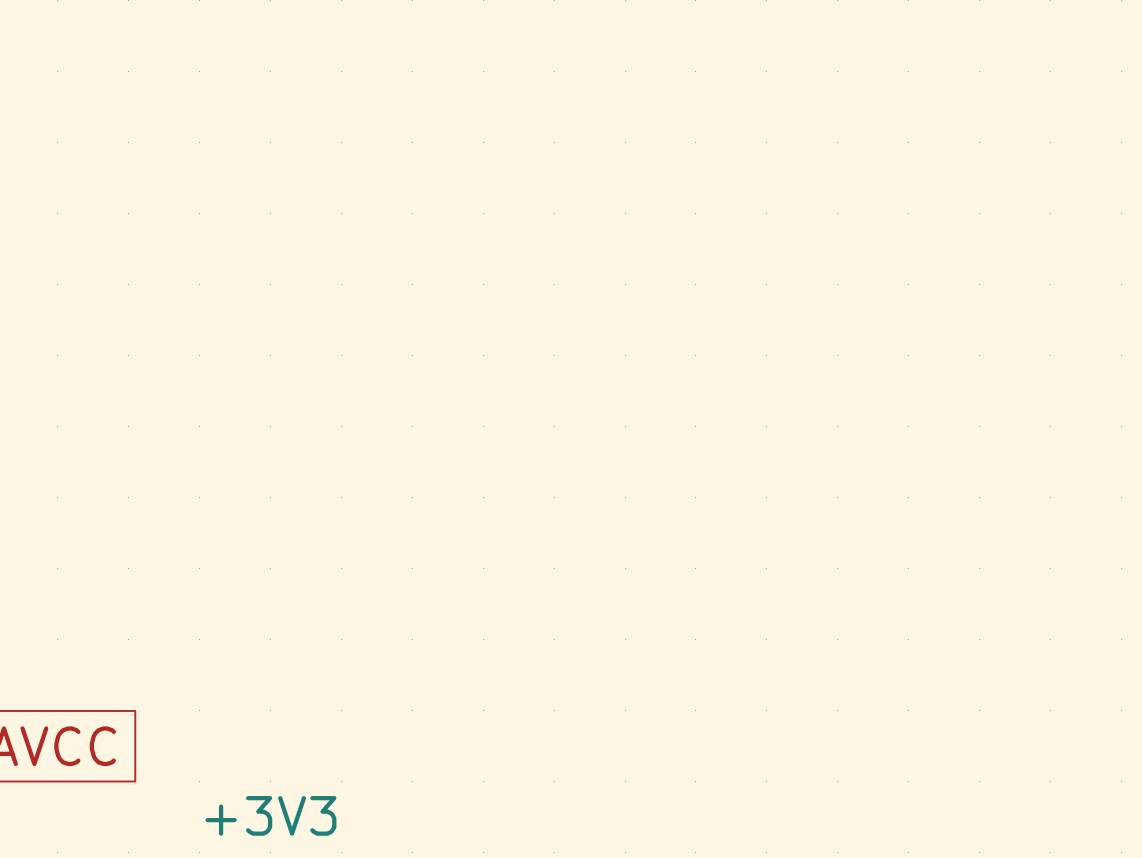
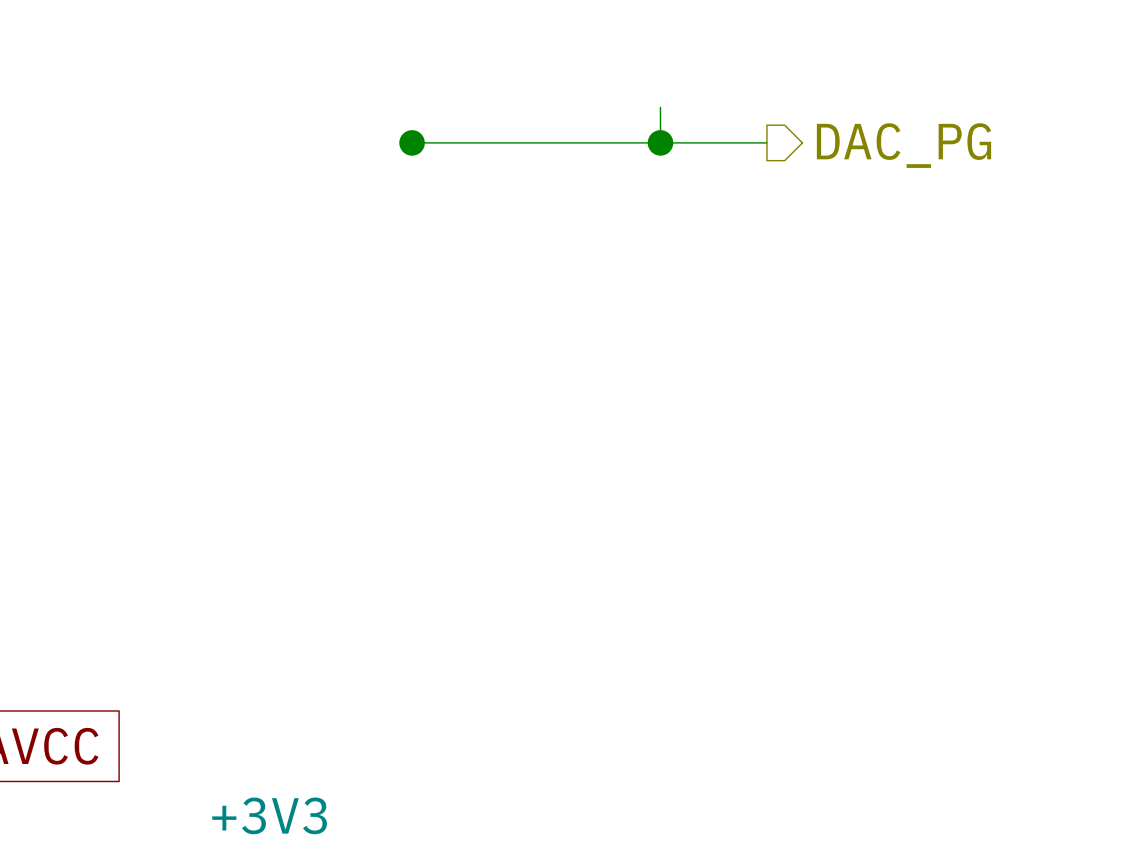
wire: none -> (660, 107) (660, 142)
wire: none -> (412, 142) (766, 142)
junction: none -> (412, 142)
junction: none -> (660, 142)
hierarchical label: none -> DAC_PG (903, 145)

